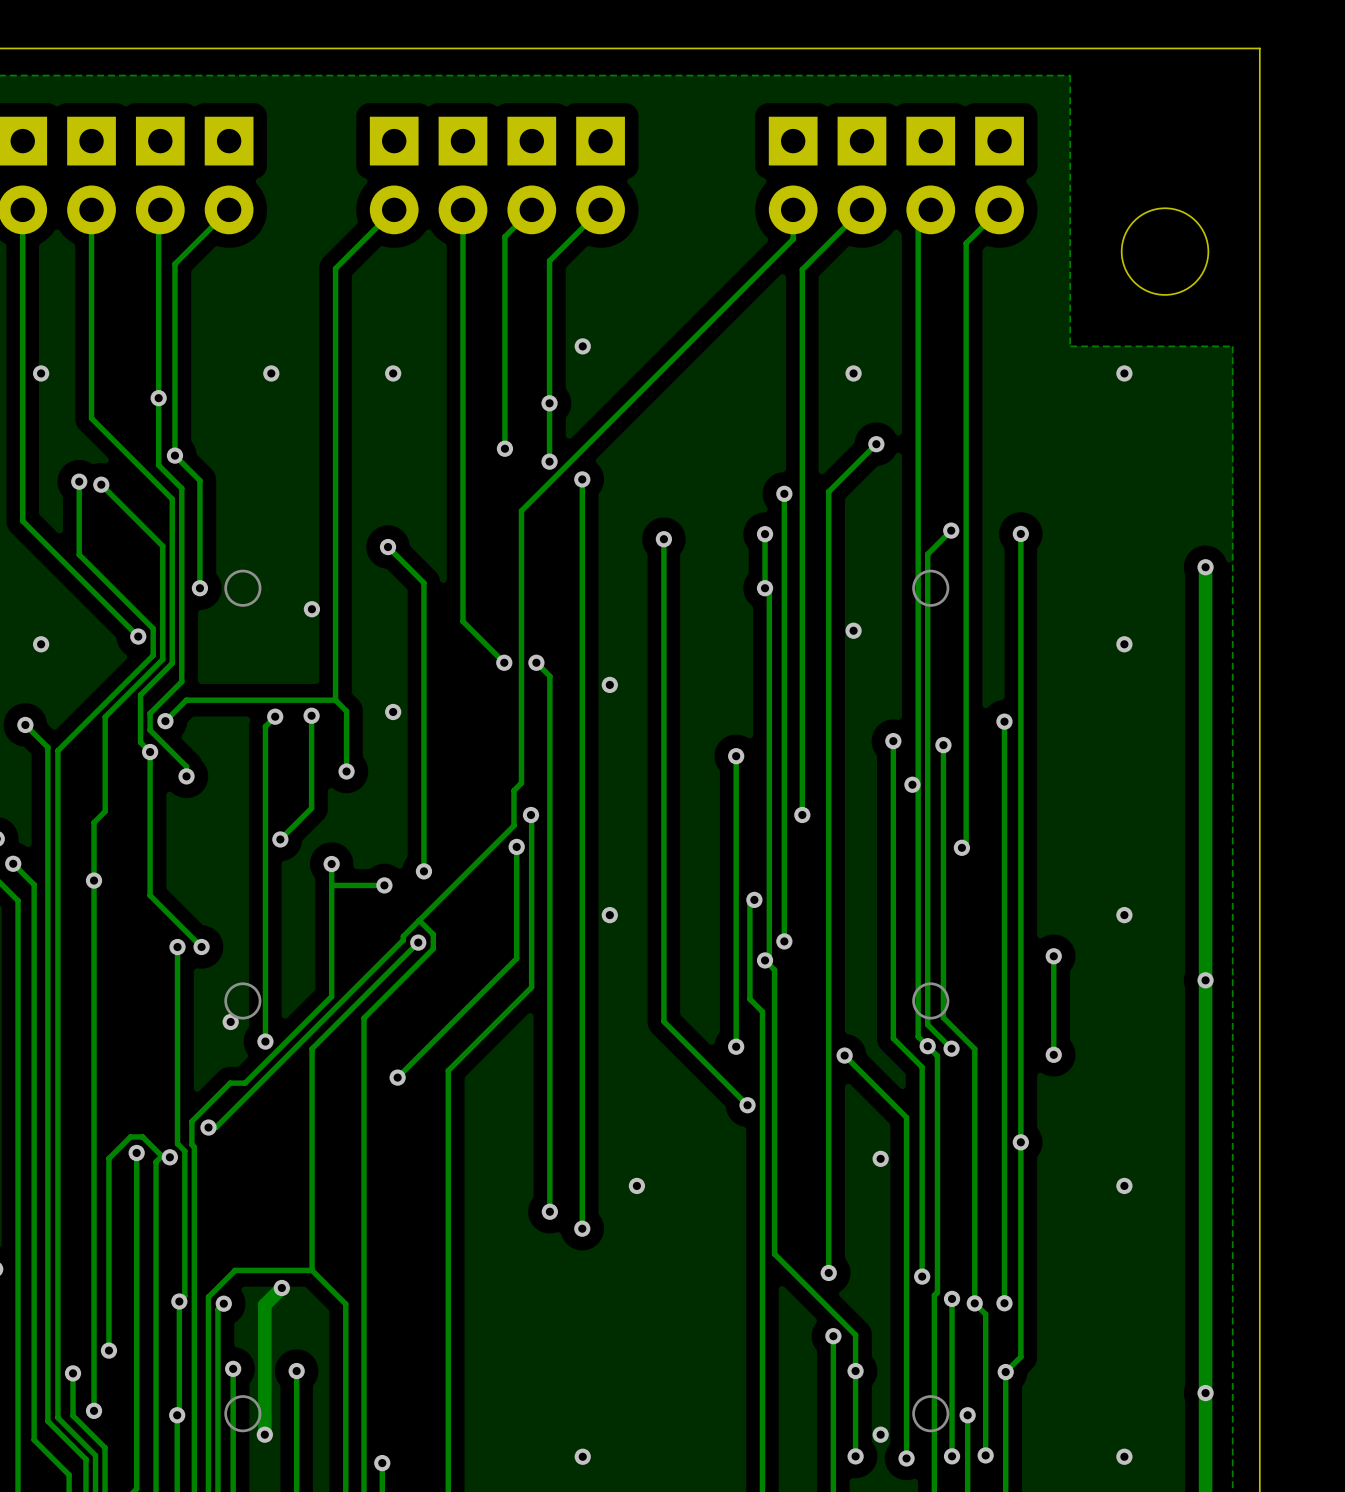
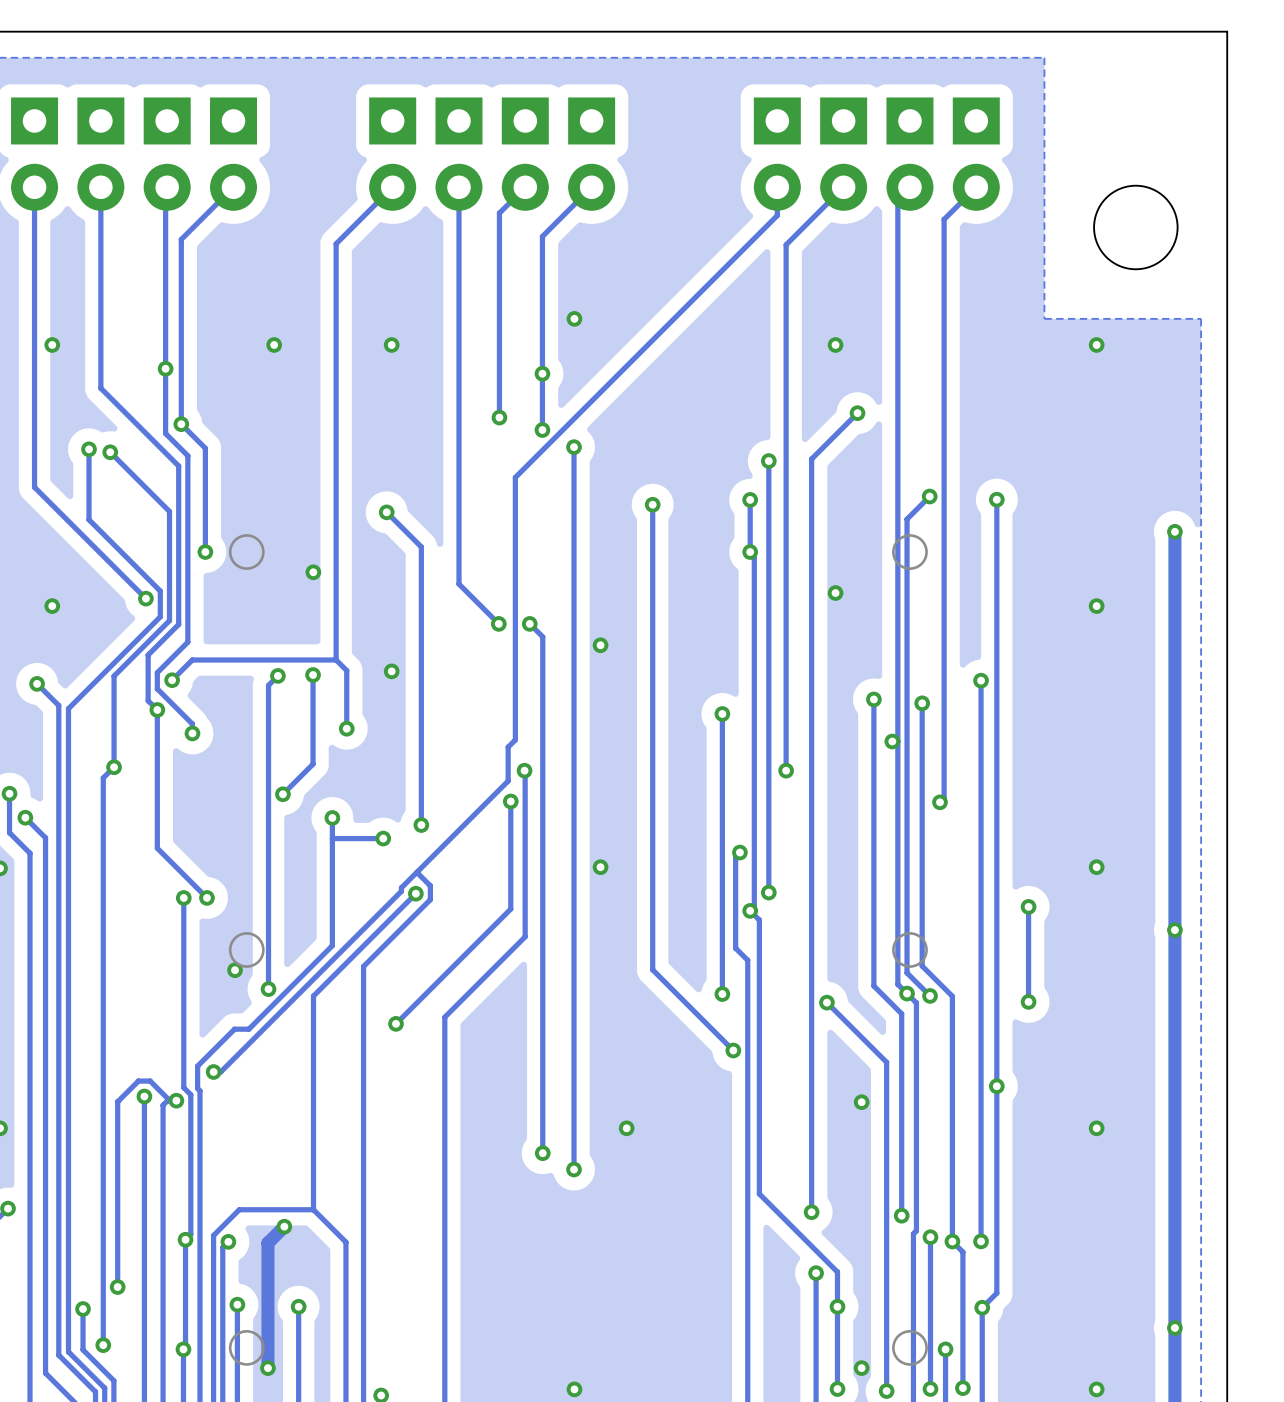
via position: (94, 880) -> (114, 767)

